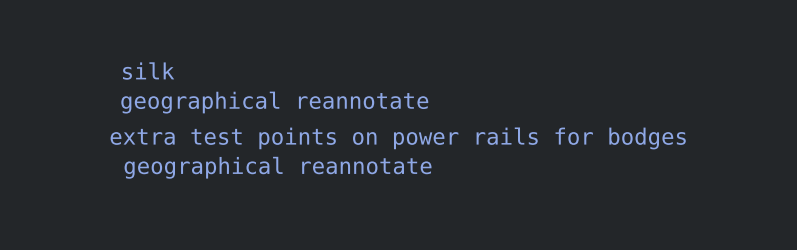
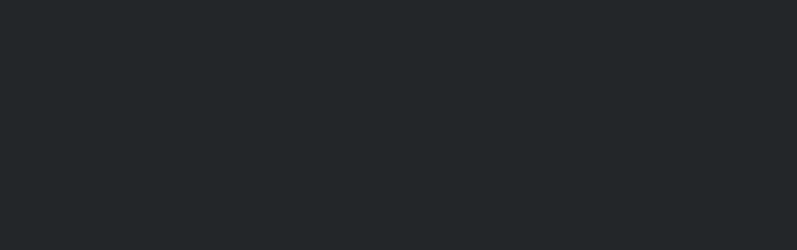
text: silk (148, 71) -> none
text: geographical reannotate (274, 102) -> none
text: extra test points on power rails for bodges (398, 138) -> none
text: geographical reannotate (278, 167) -> none

